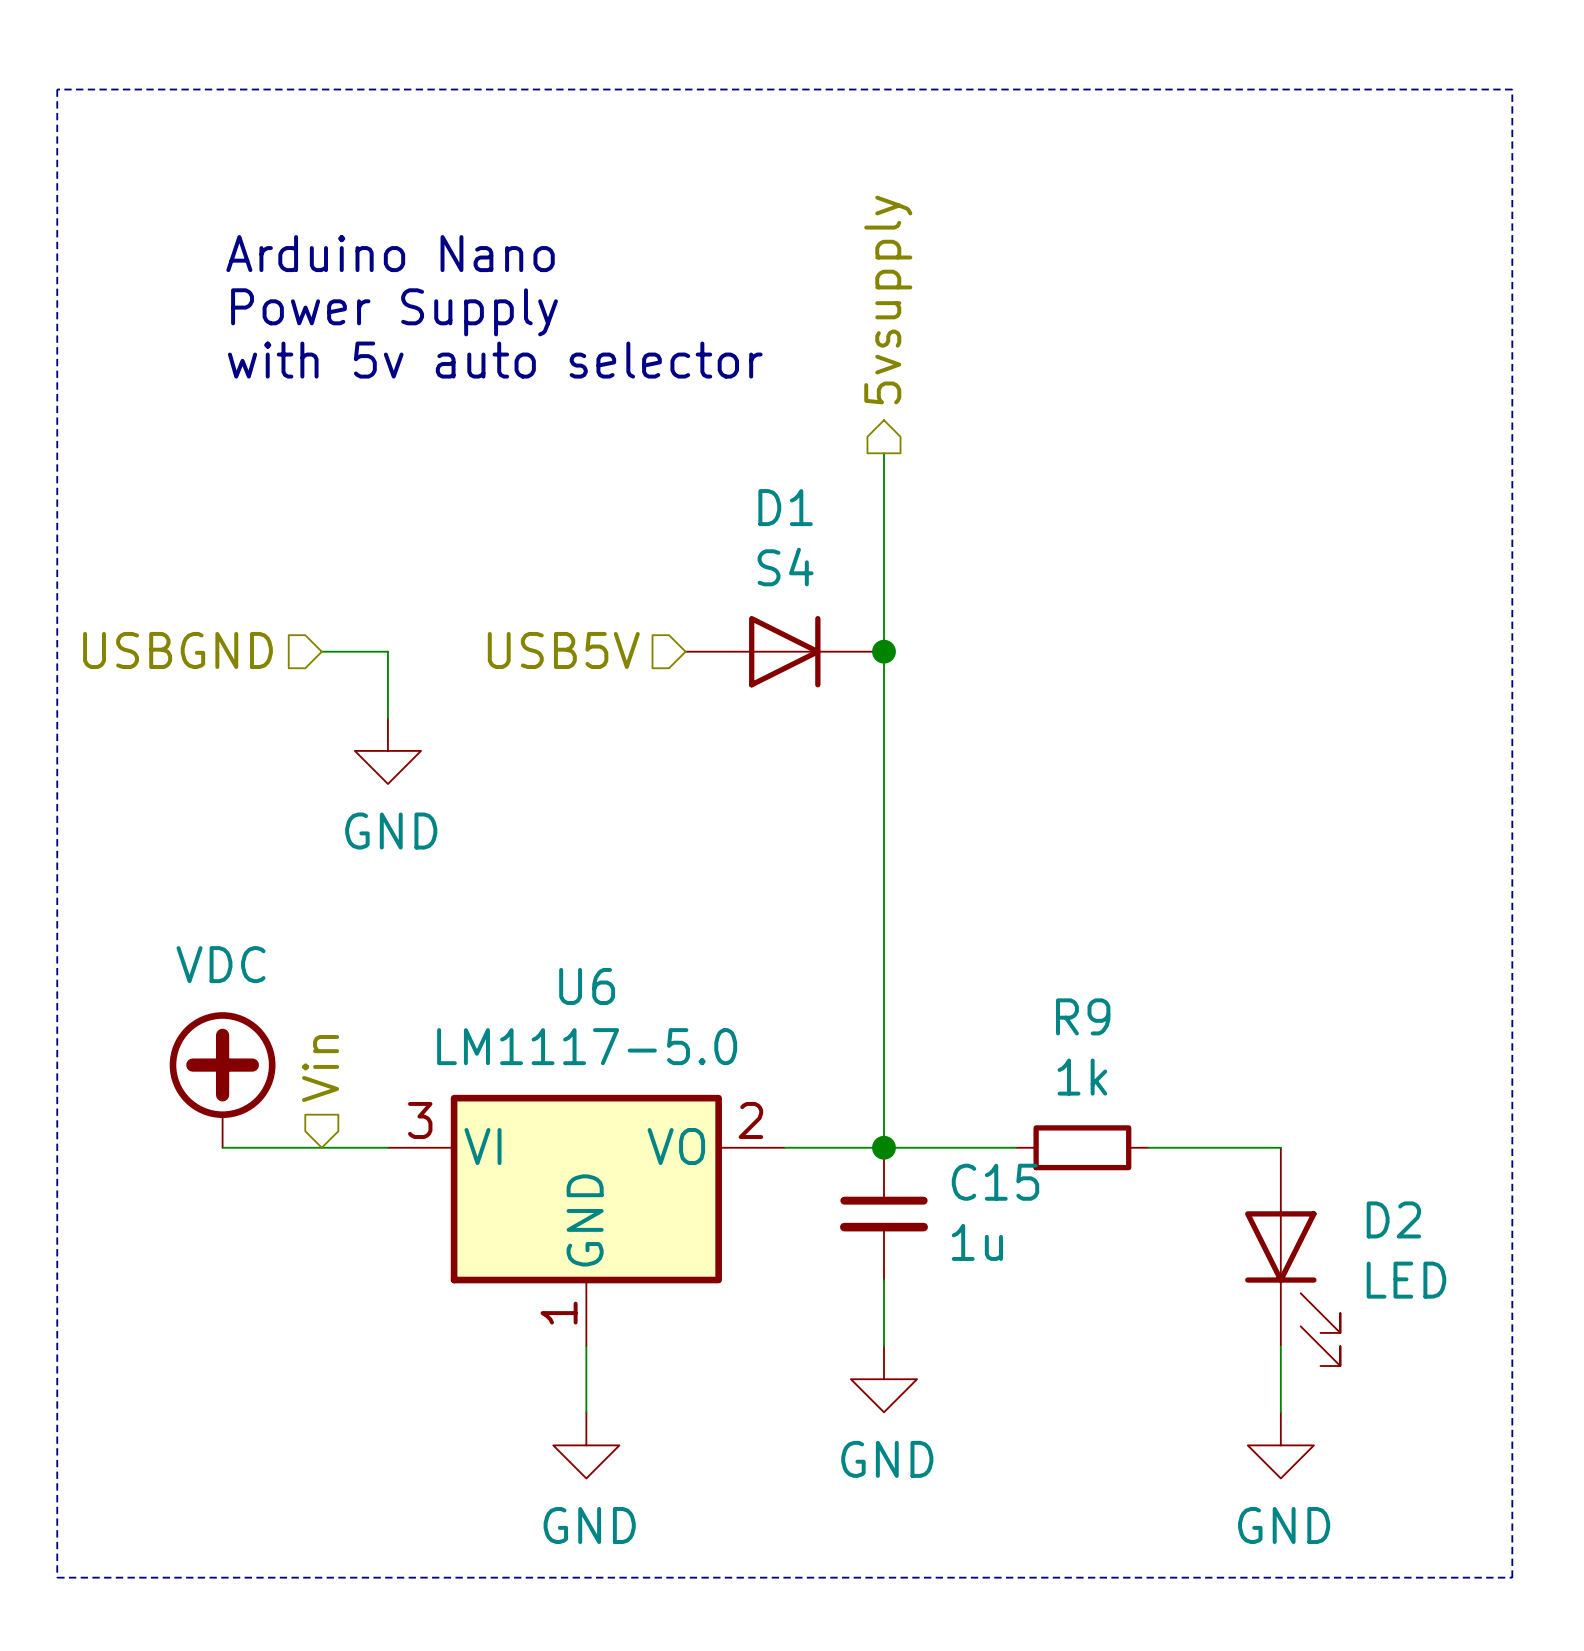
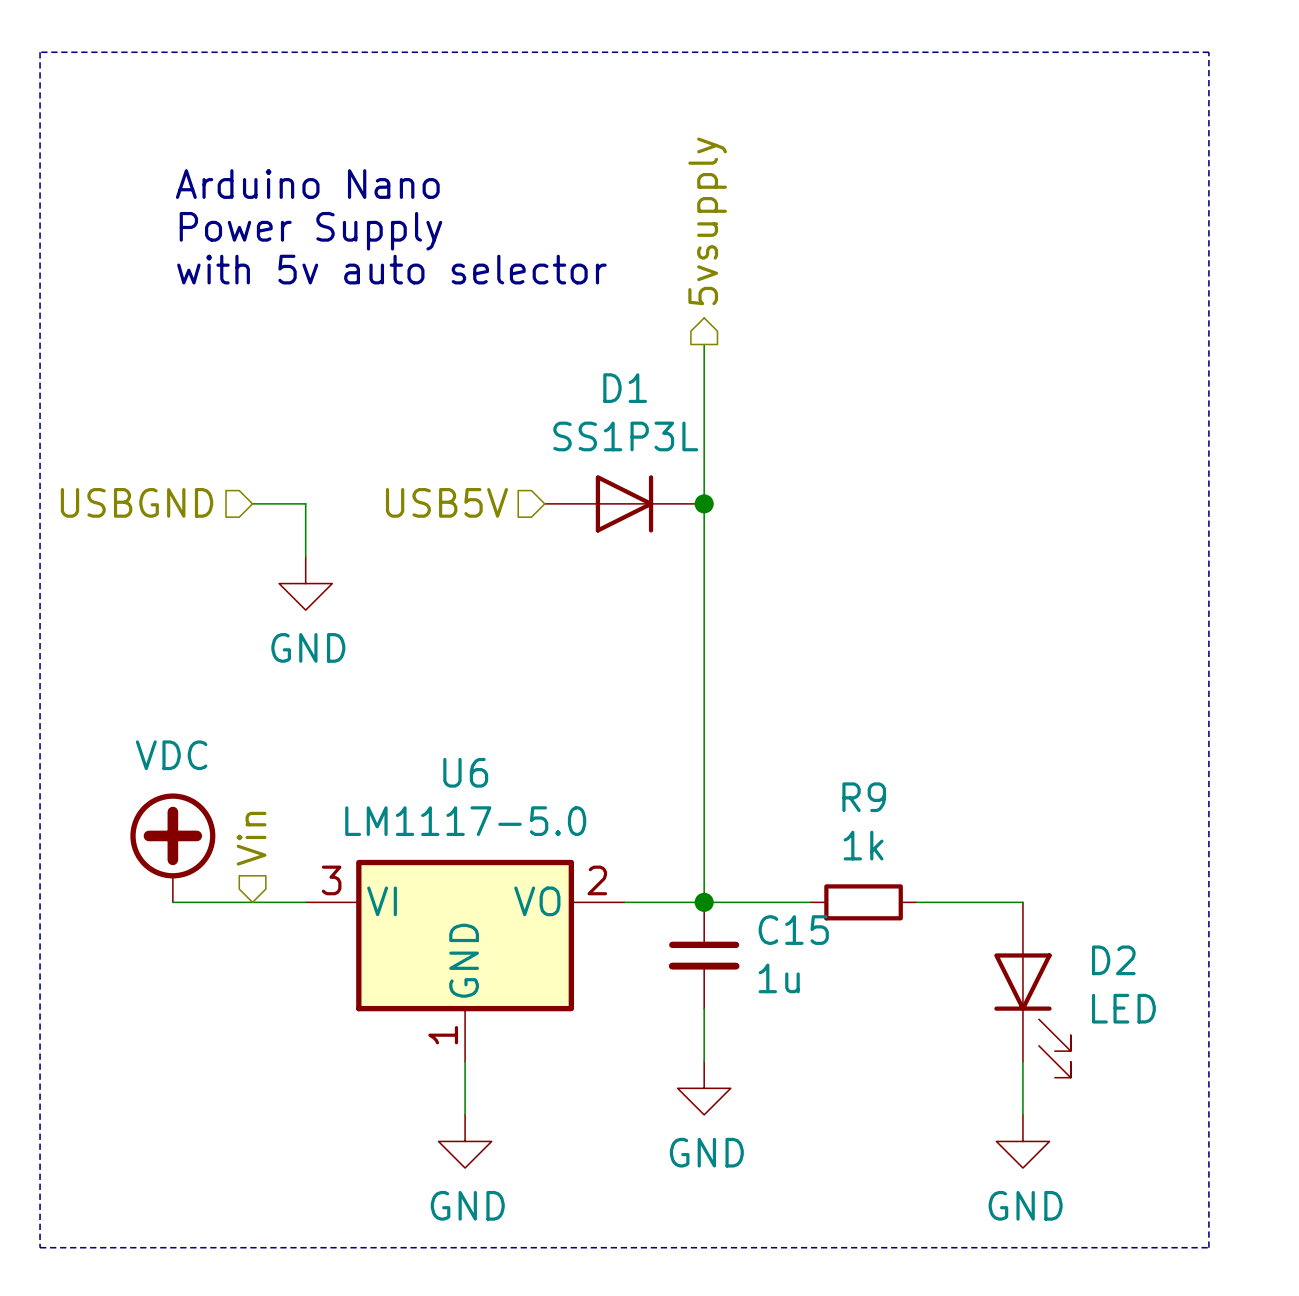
D1 value: S4 (785, 567) -> SS1P3L (625, 436)

